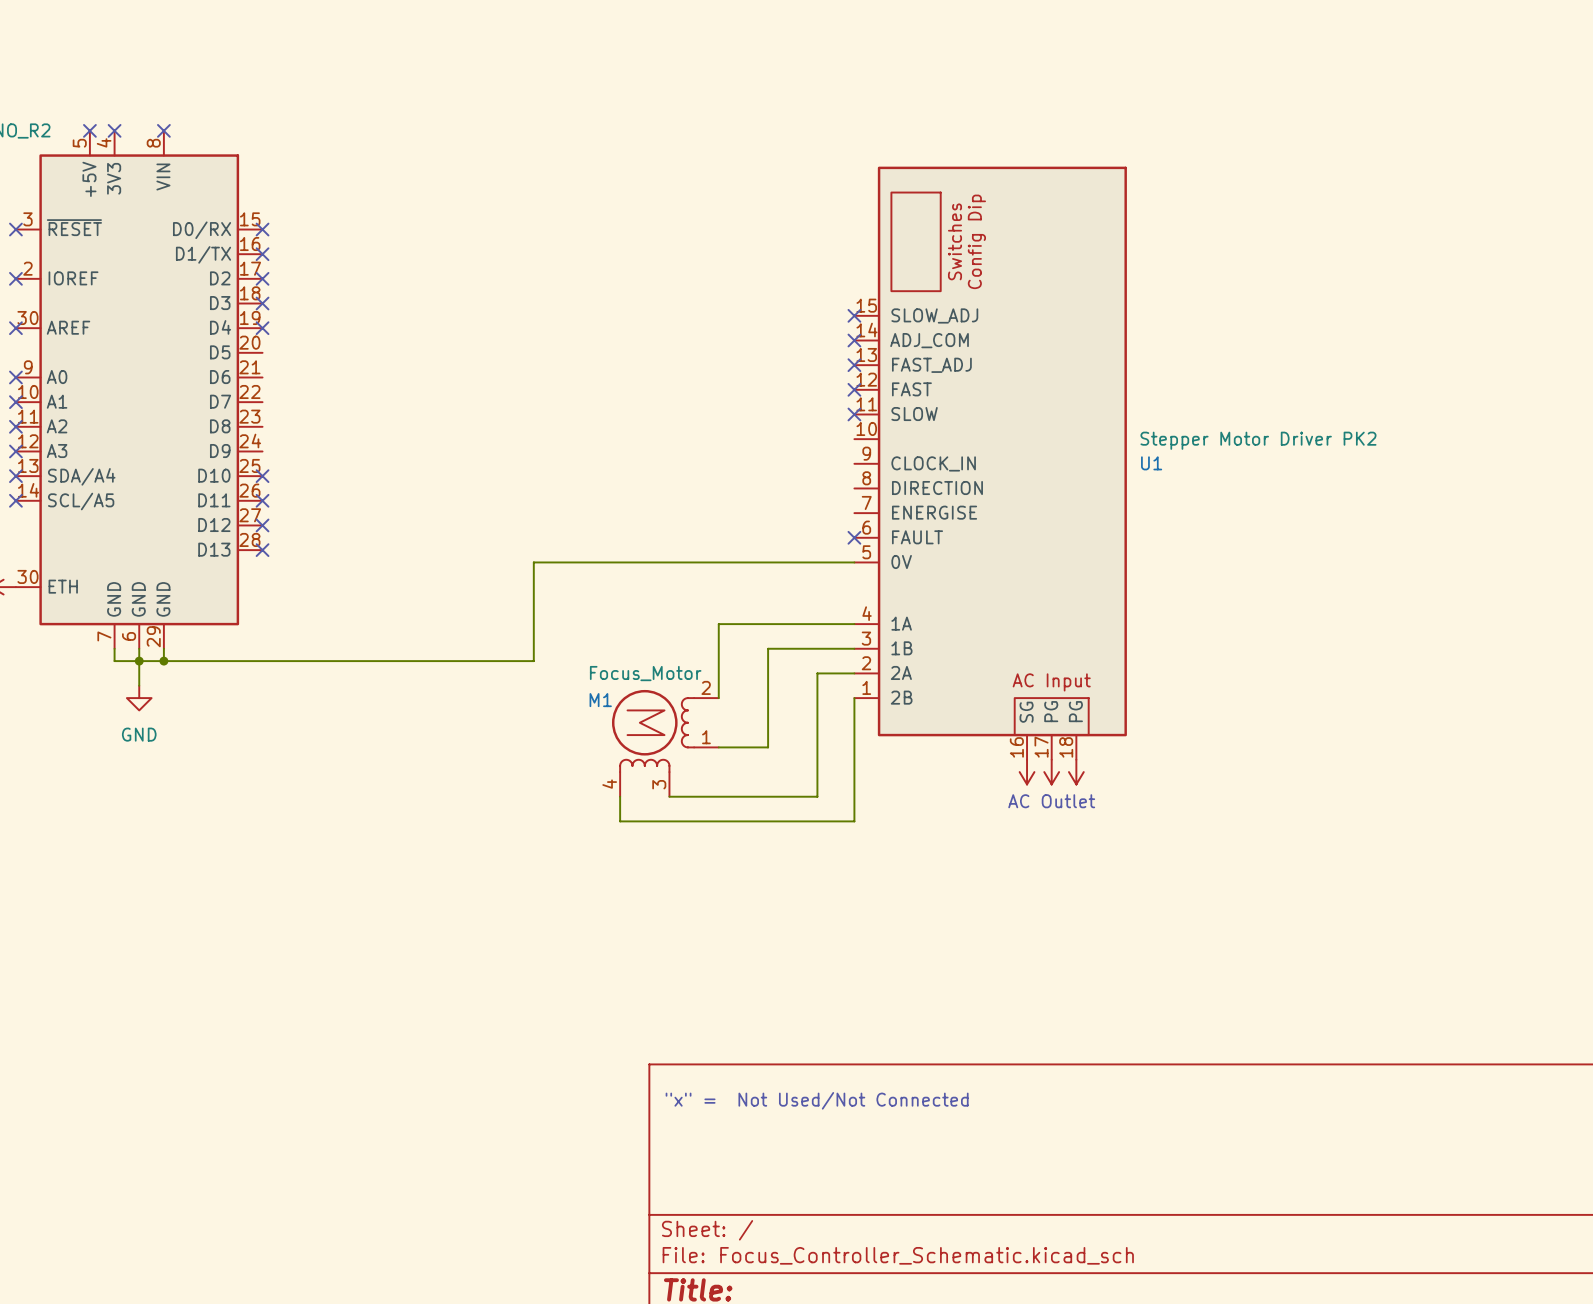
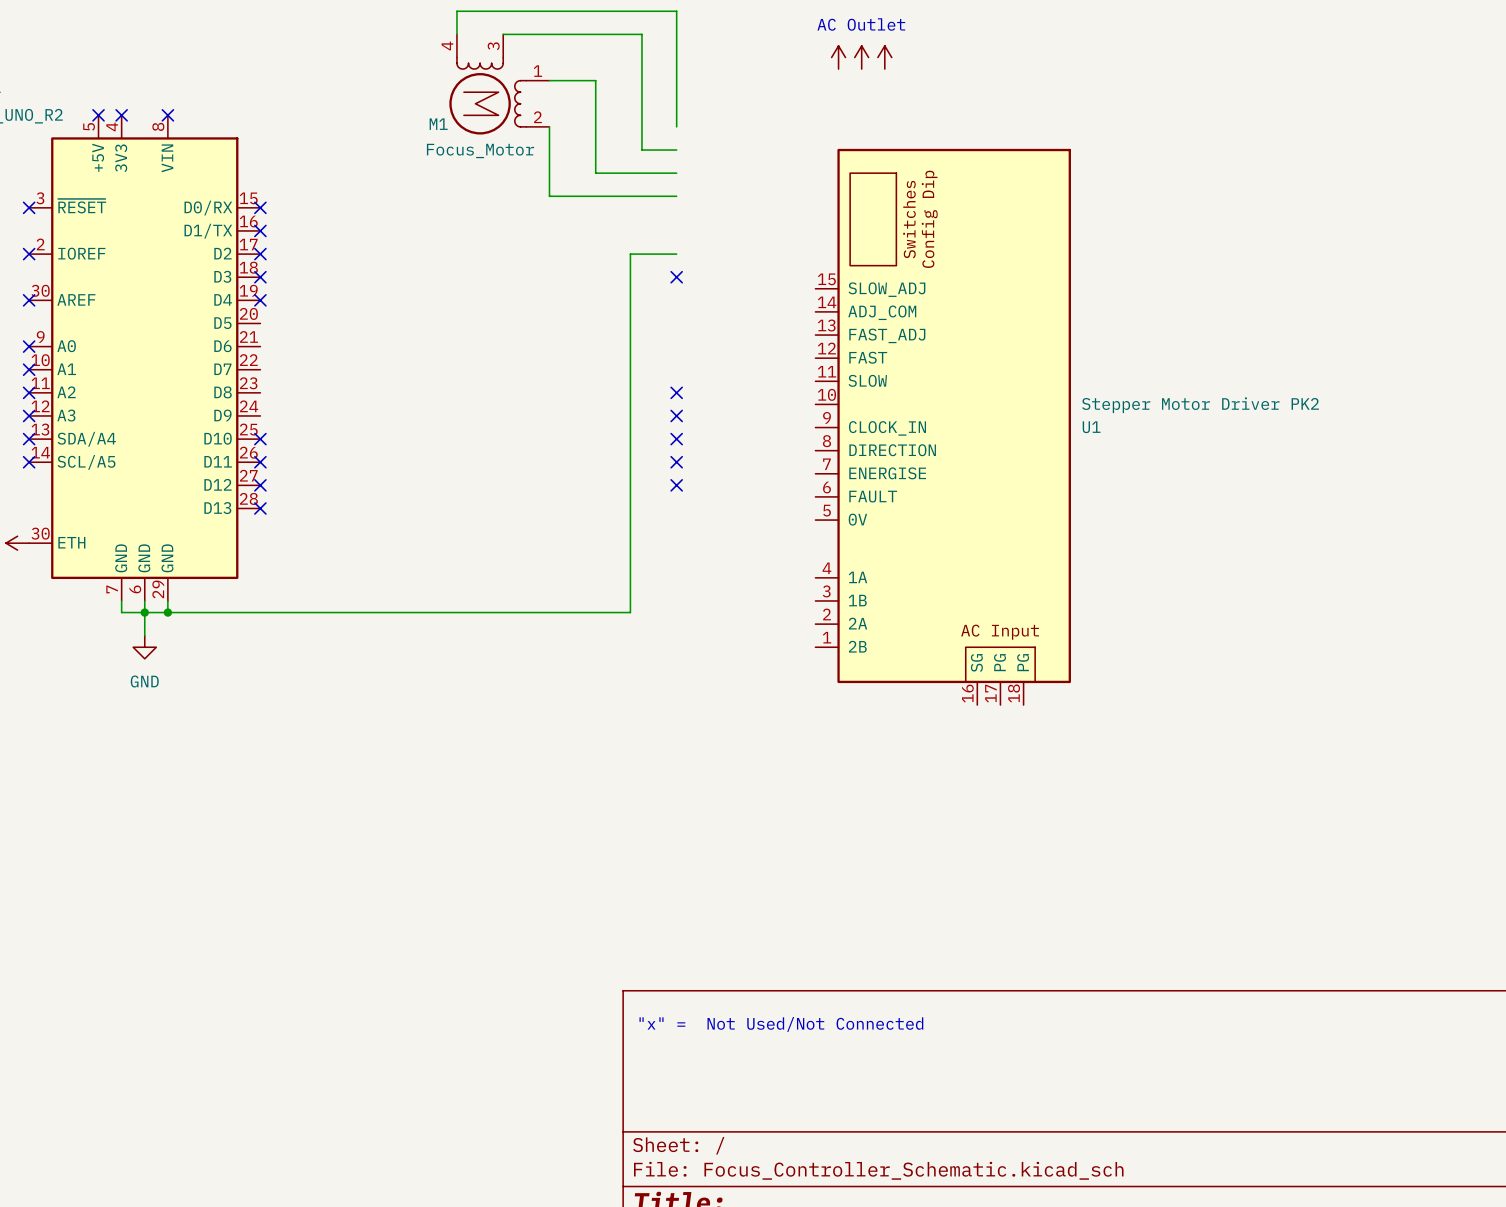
text: none -> AC Outlet (861, 24)
wire: none -> (456, 34) (456, 11) (676, 11) (676, 126)
wire: none -> (503, 34) (641, 34) (641, 150) (676, 150)
power symbol: none -> (838, 57)
power symbol: none -> (861, 57)
power symbol: none -> (884, 57)
wire: none -> (549, 80) (595, 80) (595, 173) (676, 173)
wire: none -> (549, 126) (549, 196) (676, 196)
no-connect mark: none -> (676, 277)
no-connect mark: (854, 315) -> none
no-connect mark: (854, 340) -> none
no-connect mark: (854, 365) -> none
no-connect mark: (854, 389) -> none
no-connect mark: (854, 414) -> none
no-connect mark: none -> (676, 392)
no-connect mark: none -> (676, 415)
no-connect mark: none -> (676, 439)
no-connect mark: none -> (676, 462)
no-connect mark: none -> (676, 485)
no-connect mark: (854, 537) -> none
wire: (854, 562) (533, 562) (533, 661) -> (676, 254) (630, 254) (630, 612) (514, 612)
wire: (854, 624) (718, 624) (718, 698) -> none
wire: (854, 648) (768, 648) (768, 747) (718, 747) -> none
wire: (854, 673) (817, 673) (817, 796) (669, 796) -> none
wire: (854, 698) (854, 821) (620, 821) (620, 796) -> none
M1 flip: as is (653, 731) -> up-down (487, 96)
M1 position: (665, 743) -> (499, 84)
power symbol: (1027, 772) -> none
power symbol: (1051, 772) -> none
power symbol: (1076, 772) -> none
text: AC Outlet (1051, 801) -> none

